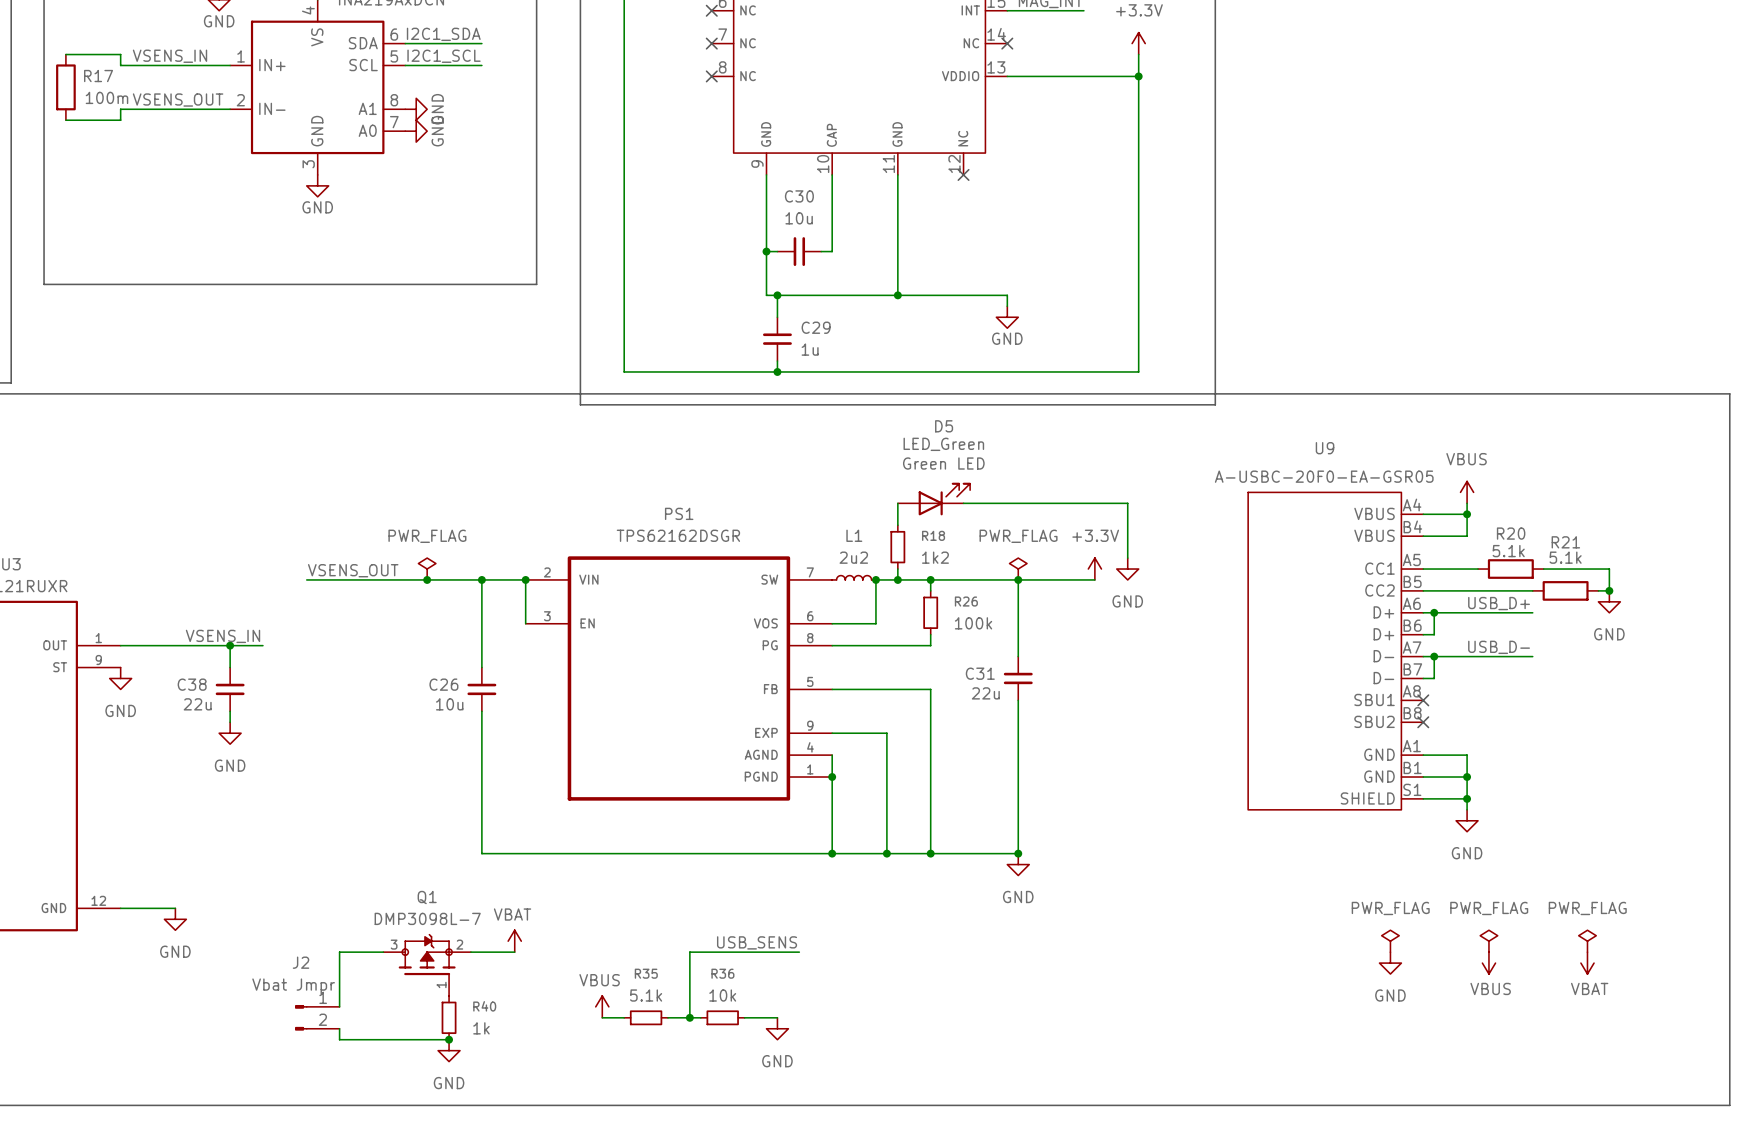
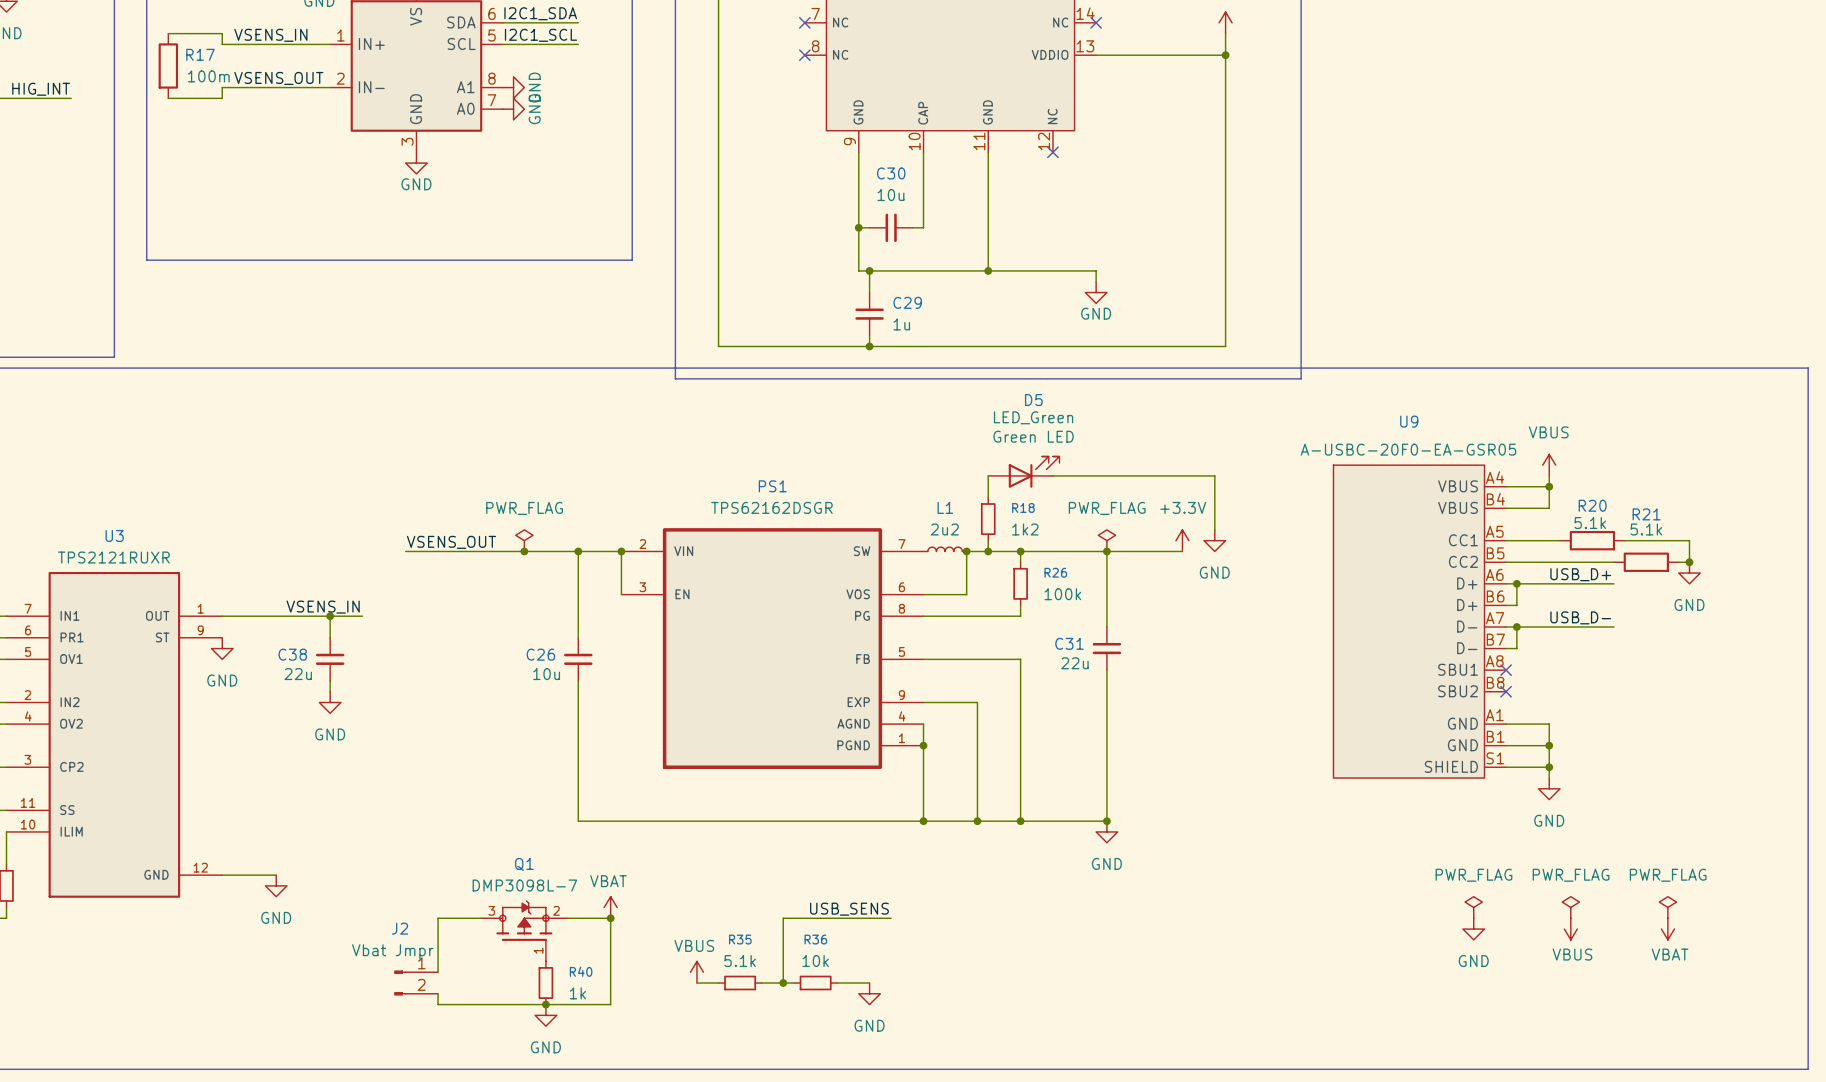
wire: none -> (610, 918) (610, 1004) (545, 1004)
junction: none -> (610, 918)

